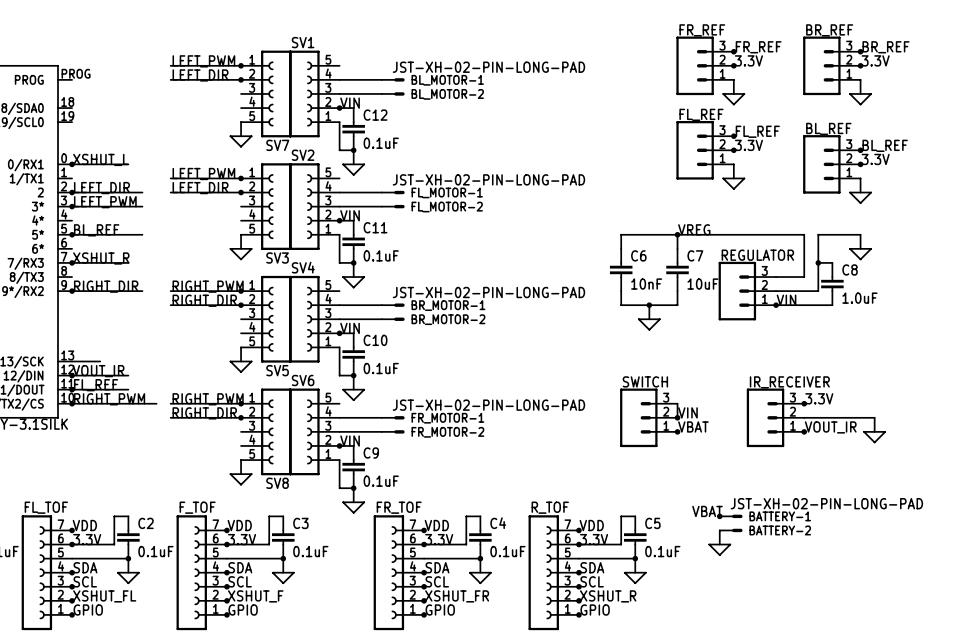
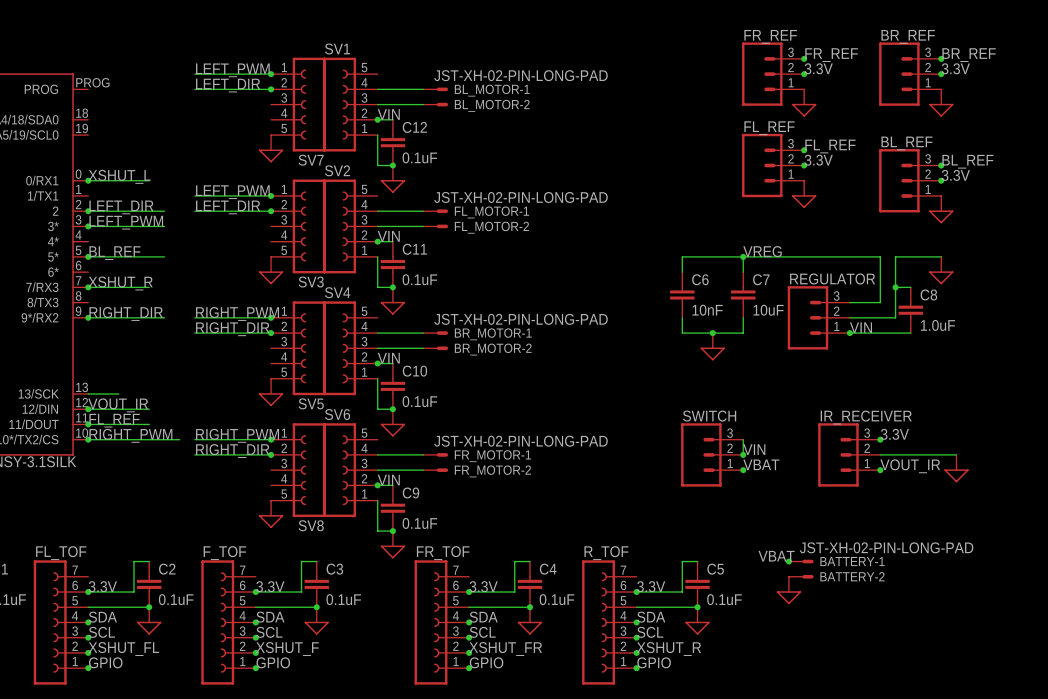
label: VDD (84, 525) -> none
label: VDD (239, 525) -> none
label: VDD (436, 525) -> none
label: VDD (591, 525) -> none
junction: (72, 530) -> none
junction: (226, 530) -> none
junction: (424, 530) -> none
junction: (578, 530) -> none

